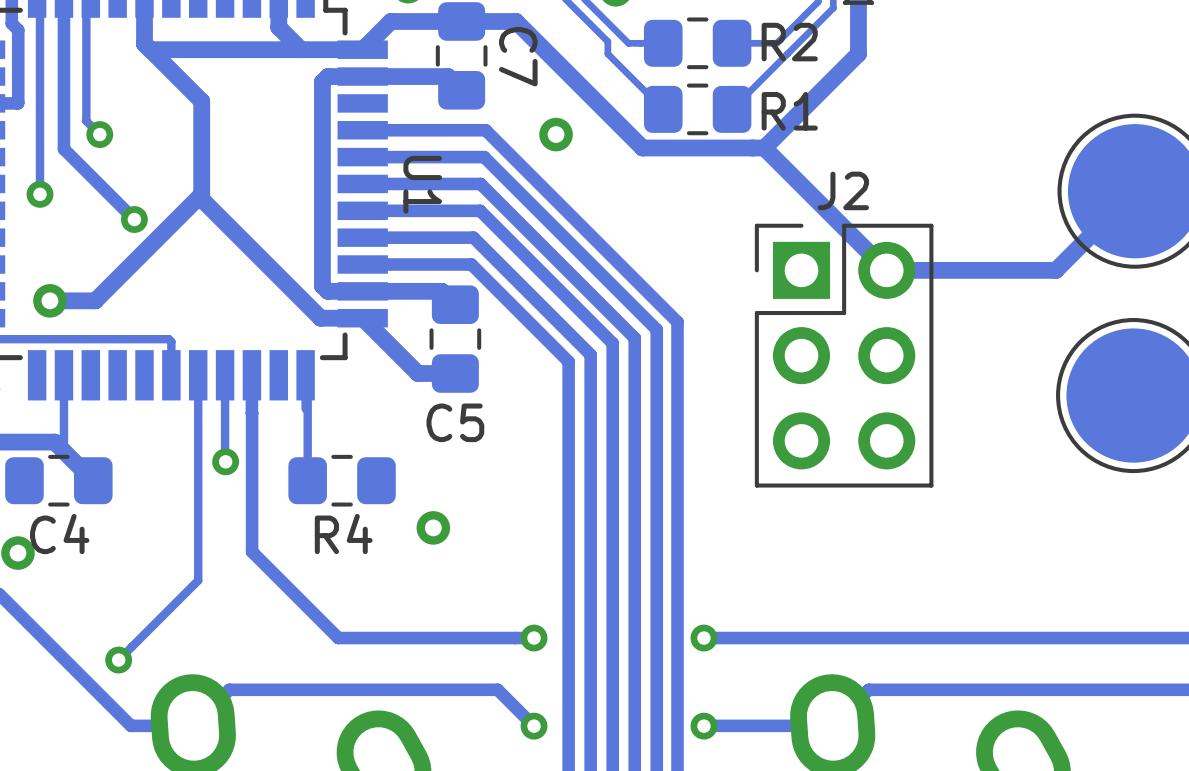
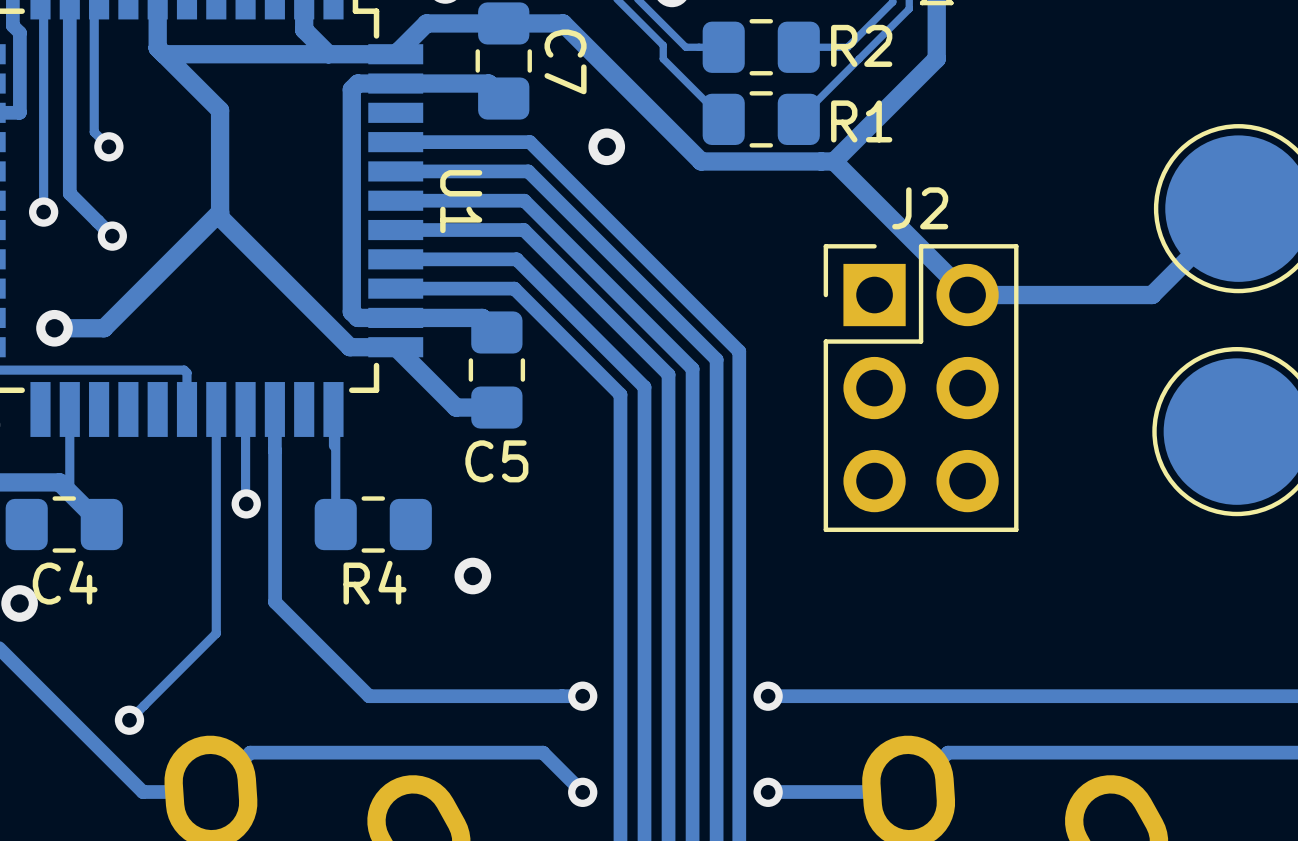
track: (63, 149) (134, 219) -> (69, 162) (69, 193) (112, 236)
via position: (134, 219) -> (112, 236)

